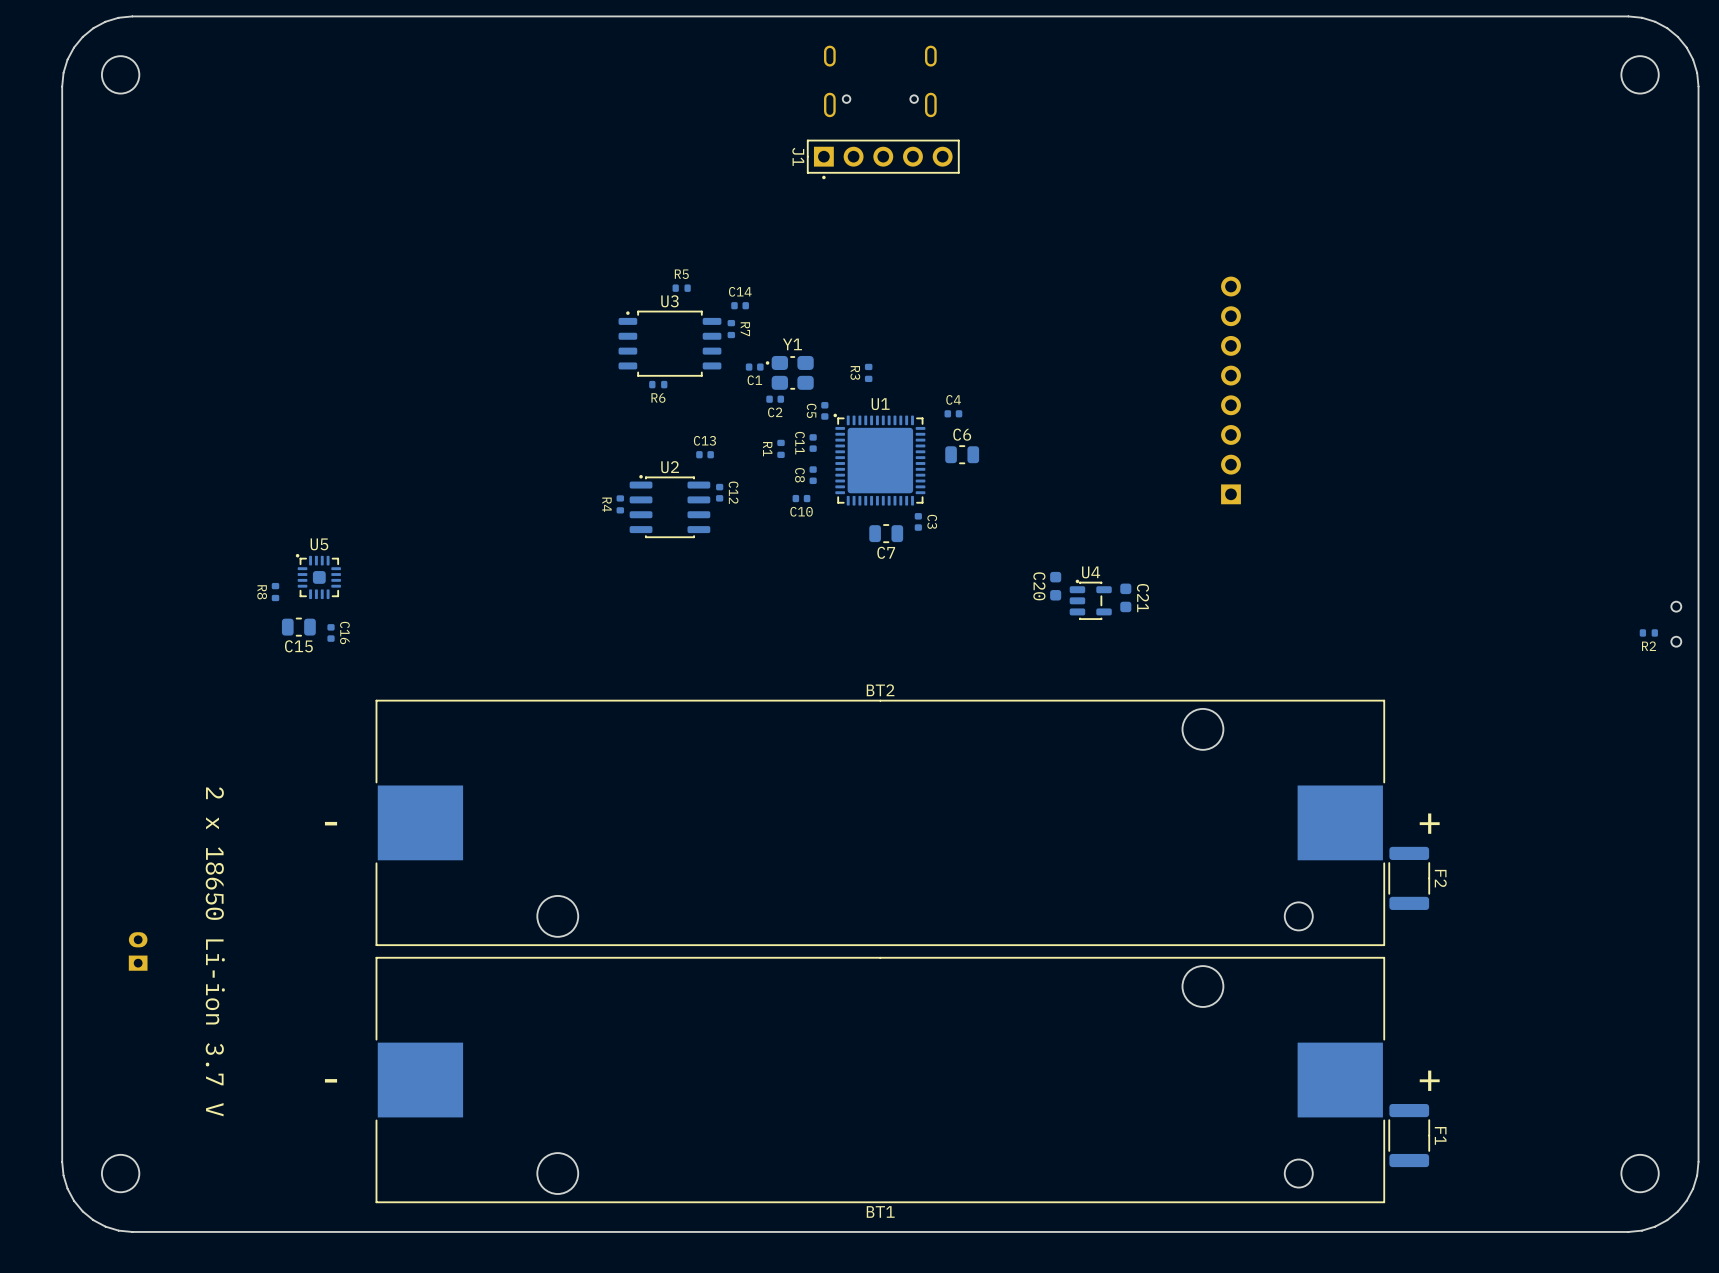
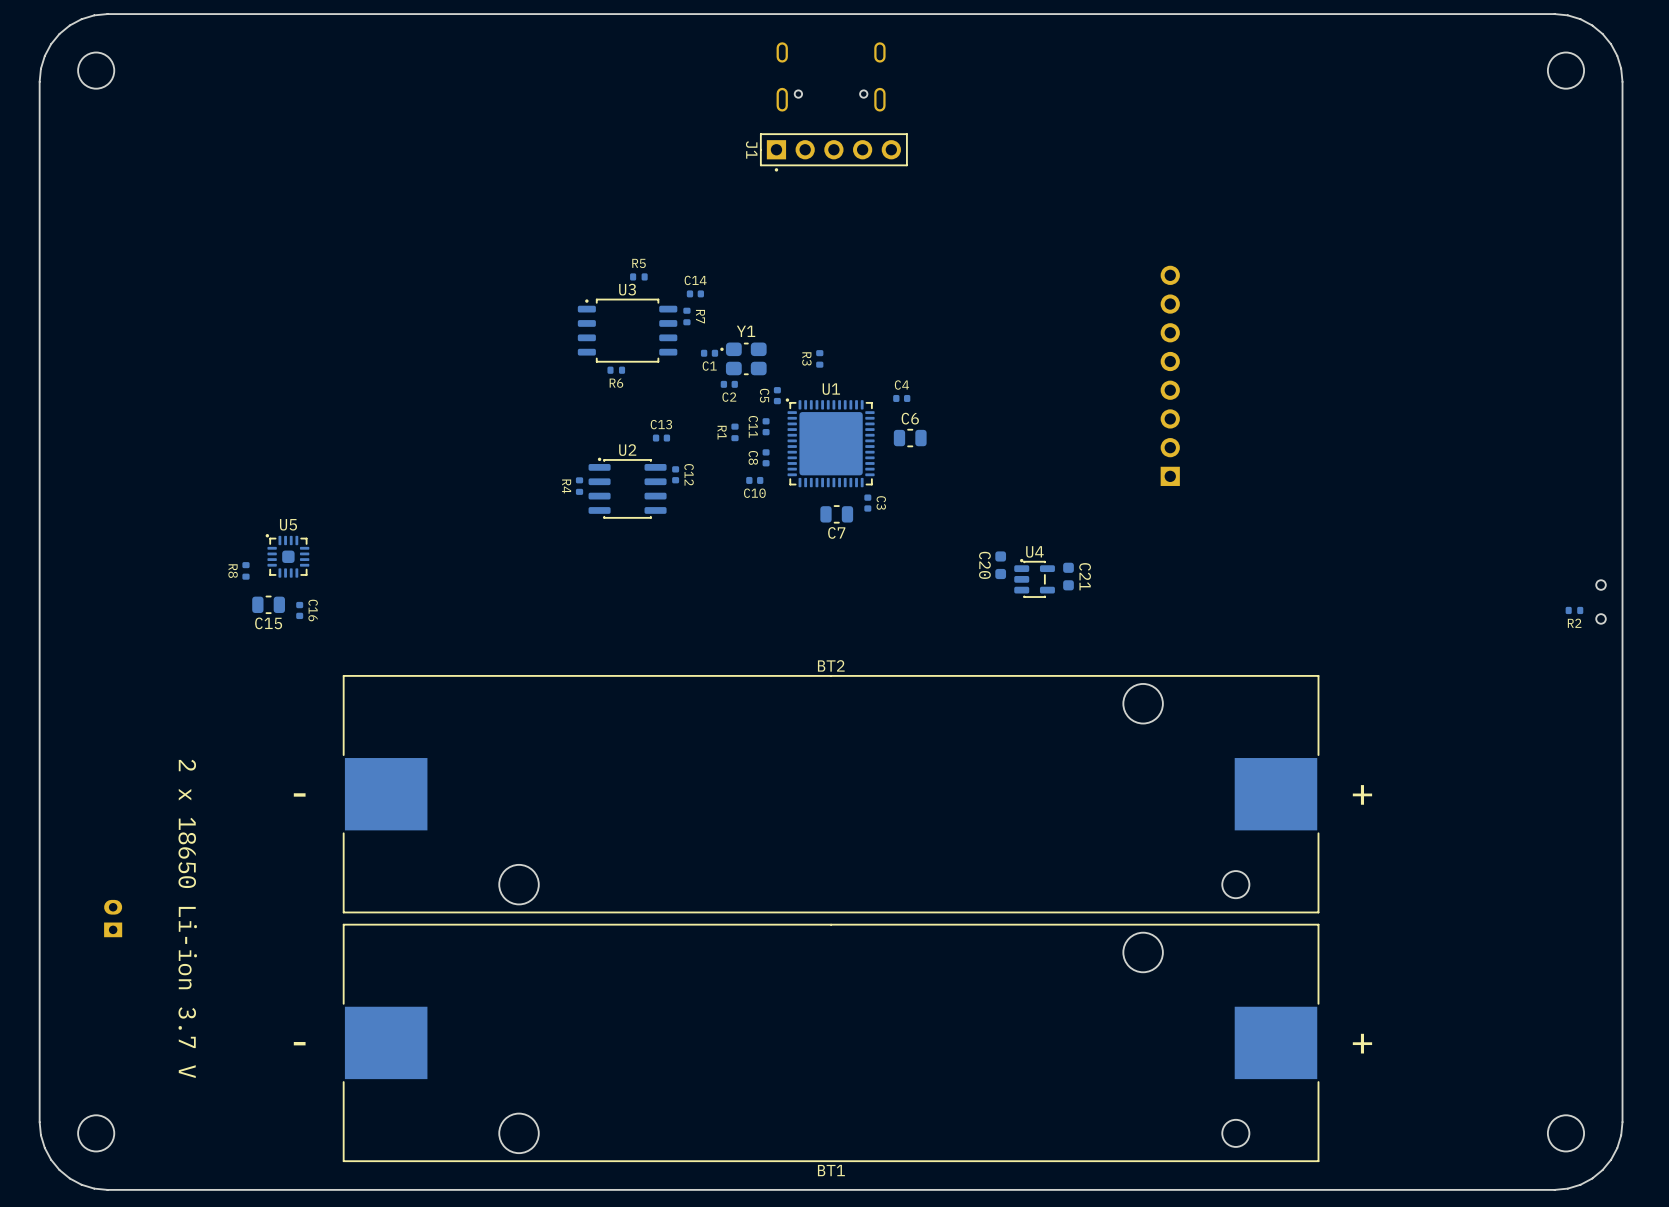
F2: (1409, 878) -> none
F1: (1409, 1135) -> none

